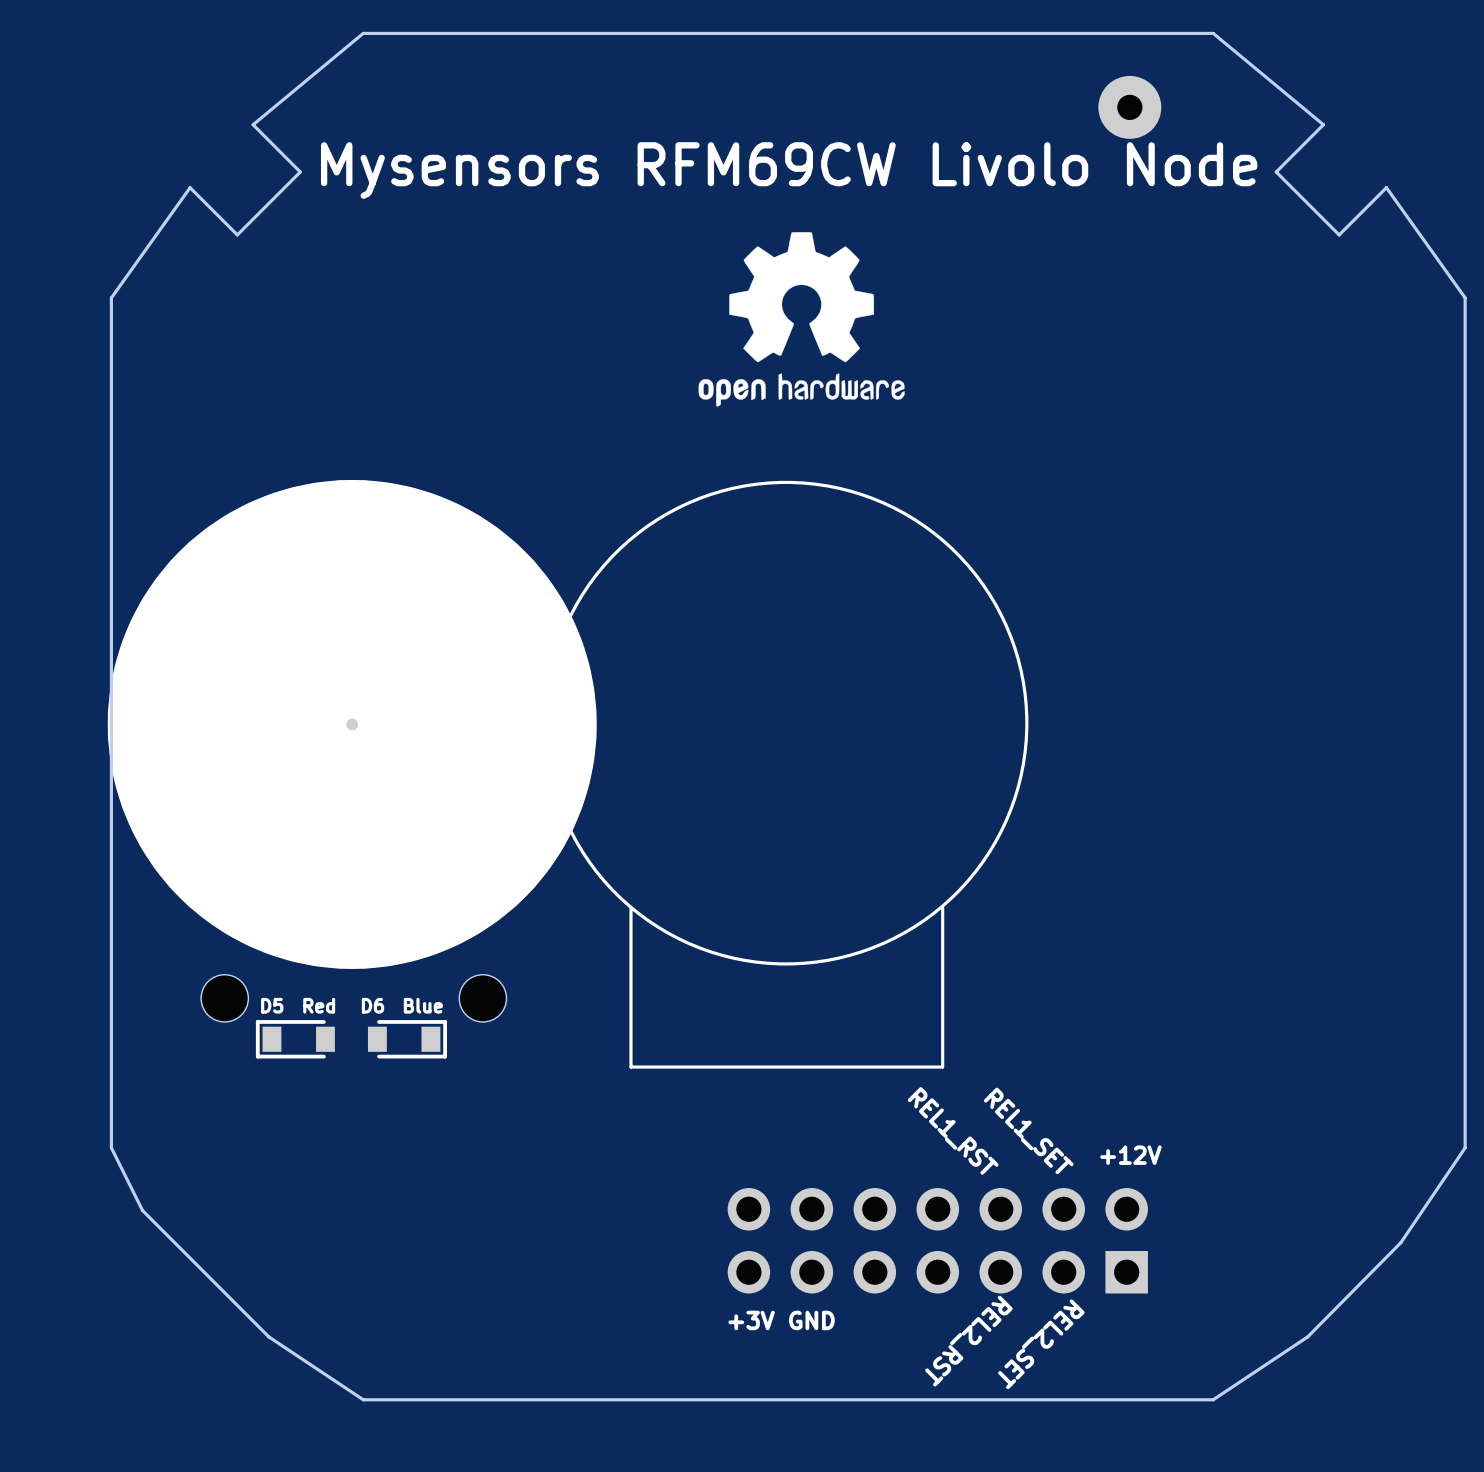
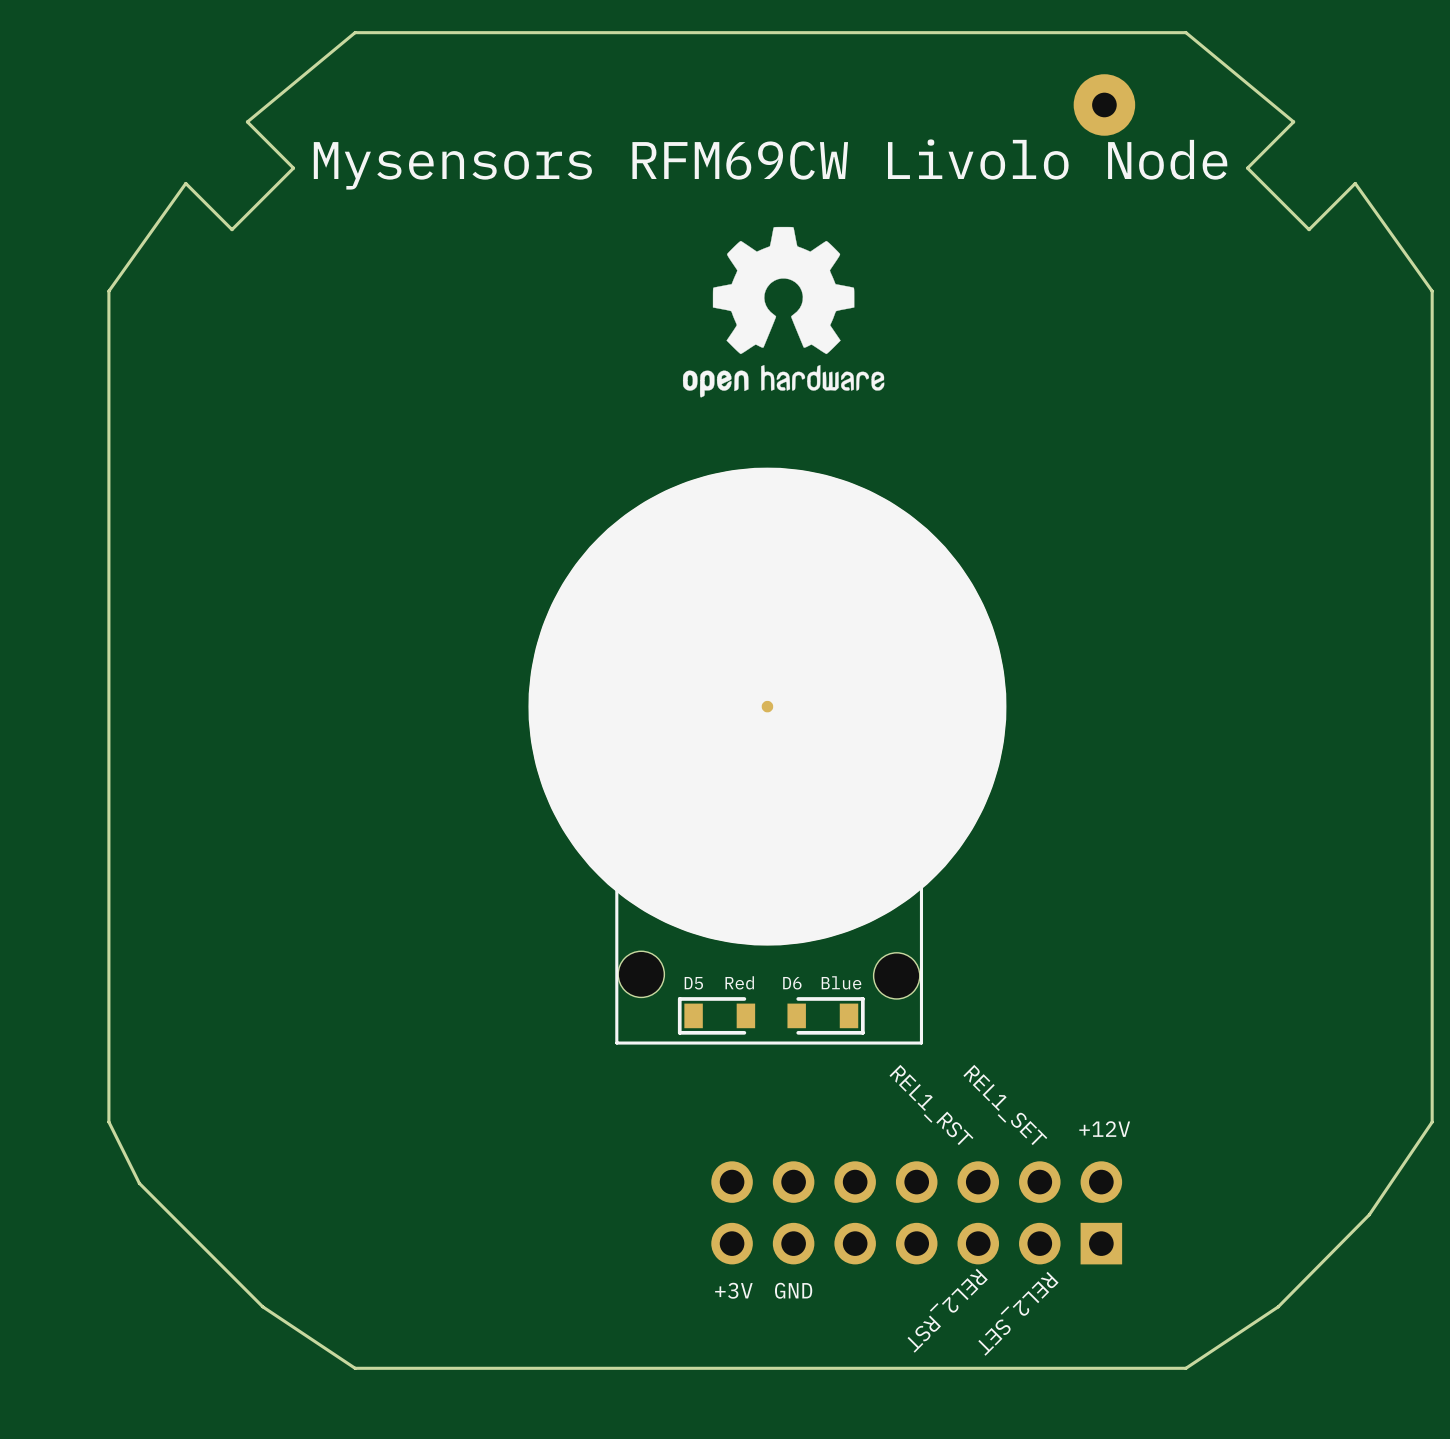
part position: (352, 724) -> (767, 706)
part: (224, 998) -> none
part position: (482, 998) -> (641, 974)
part: none -> (896, 975)
D5 position: (295, 1039) -> (716, 1015)
D6 position: (407, 1039) -> (826, 1015)

